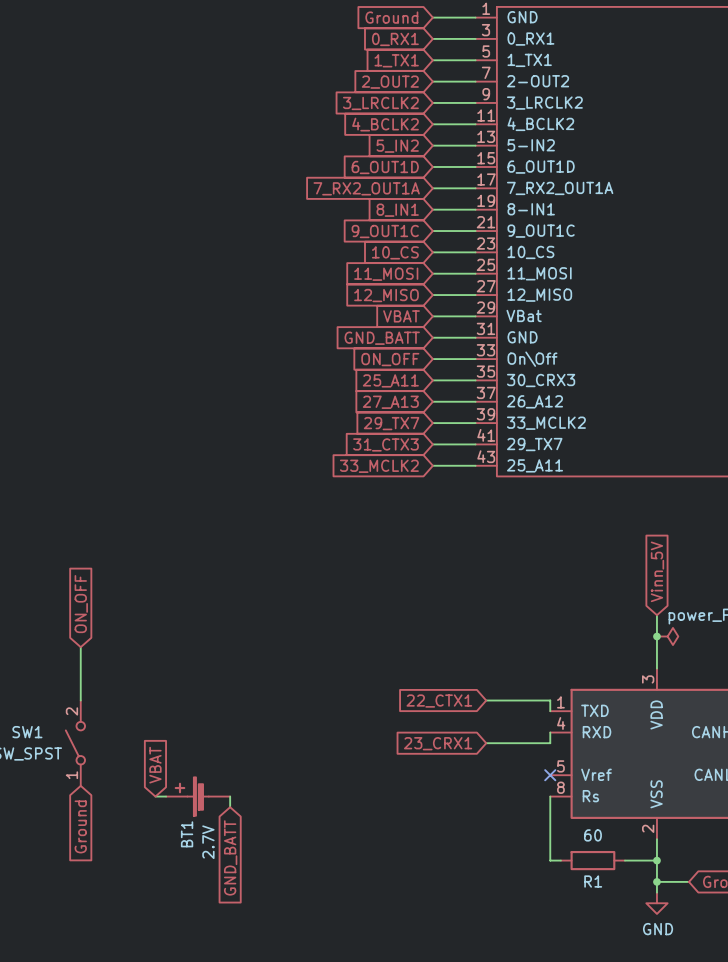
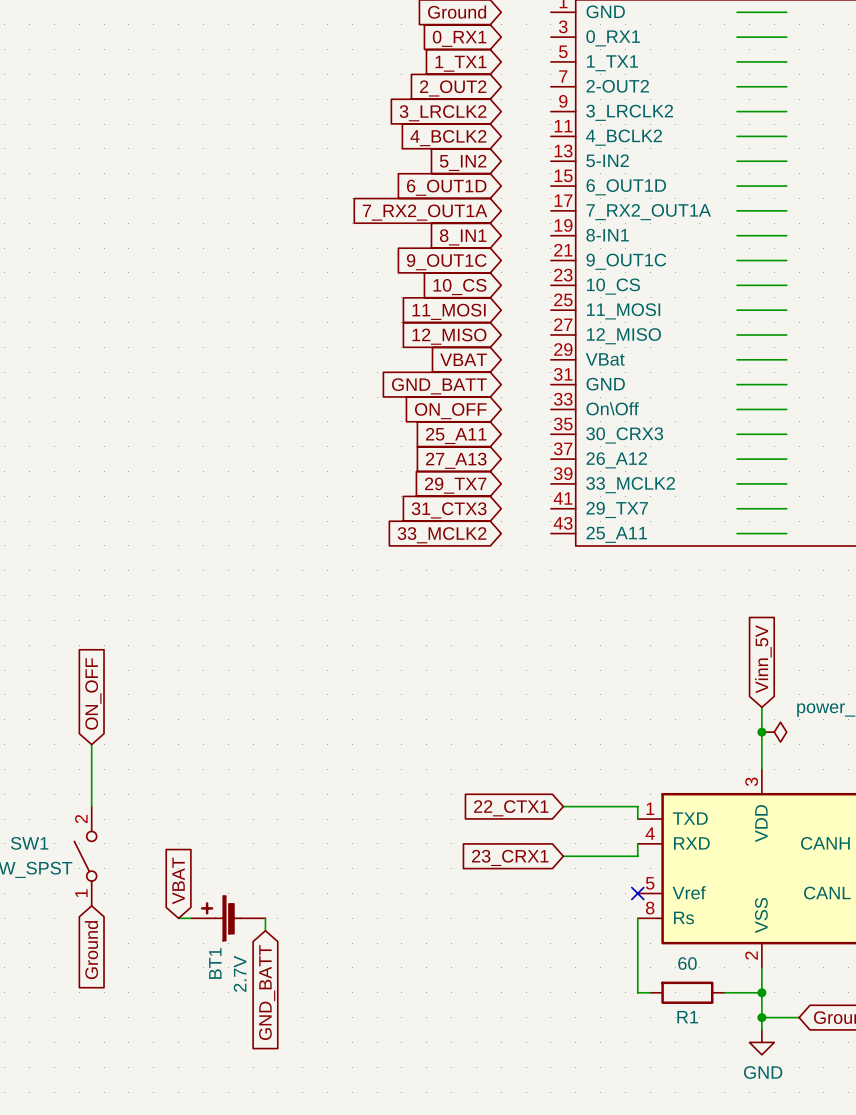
wire: (432, 17) (475, 17) -> (737, 12) (786, 12)
wire: (432, 38) (475, 38) -> (737, 37) (786, 37)
wire: (432, 60) (475, 60) -> (737, 61) (786, 61)
wire: (432, 81) (475, 81) -> (737, 86) (786, 86)
wire: (432, 102) (475, 102) -> (737, 111) (786, 111)
wire: (432, 124) (475, 124) -> (737, 136) (786, 136)
wire: (432, 145) (475, 145) -> (737, 161) (786, 161)
wire: (432, 166) (475, 166) -> (737, 186) (786, 186)
wire: (432, 188) (475, 188) -> (737, 210) (786, 210)
wire: (432, 209) (475, 209) -> (737, 235) (786, 235)
wire: (432, 231) (475, 231) -> (737, 260) (786, 260)
wire: (432, 252) (475, 252) -> (737, 285) (786, 285)
wire: (432, 273) (475, 273) -> (737, 310) (786, 310)
wire: (432, 295) (475, 295) -> (737, 334) (786, 334)
wire: (432, 316) (475, 316) -> (737, 359) (786, 359)
wire: (432, 337) (475, 337) -> (737, 384) (786, 384)
wire: (432, 359) (475, 359) -> (737, 409) (786, 409)
wire: (432, 380) (475, 380) -> (737, 434) (786, 434)
wire: (432, 401) (475, 401) -> (737, 459) (786, 459)
wire: (432, 423) (475, 423) -> (737, 483) (786, 483)
wire: (432, 444) (475, 444) -> (737, 508) (786, 508)
wire: (432, 465) (475, 465) -> (737, 533) (786, 533)

